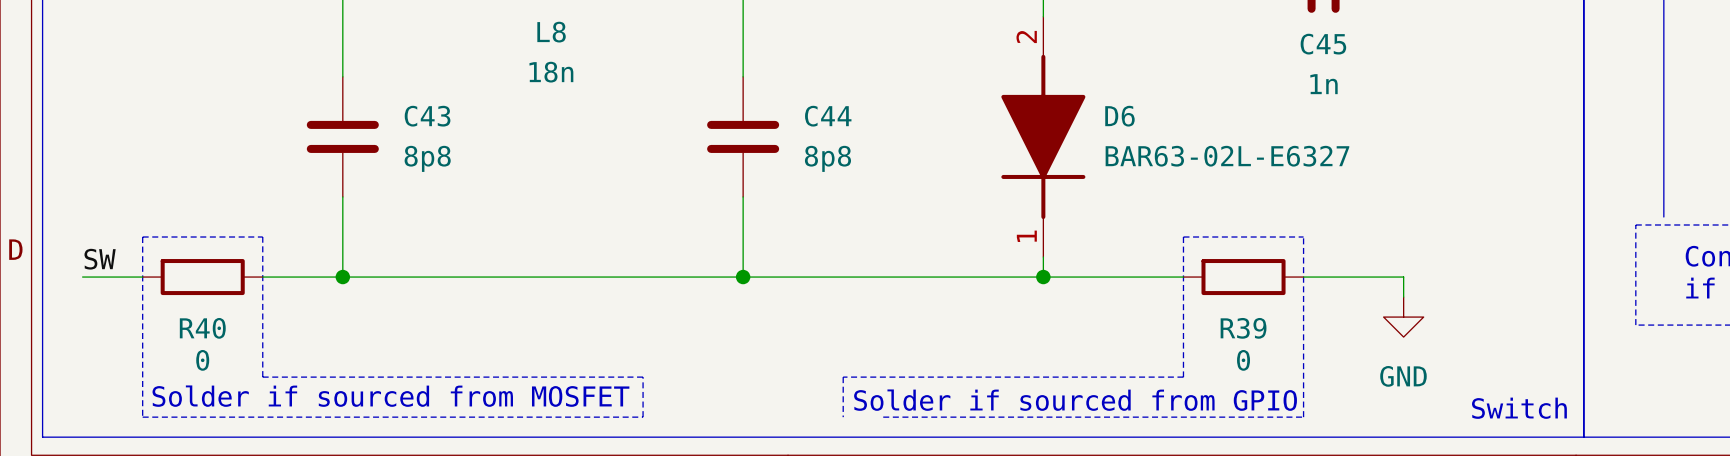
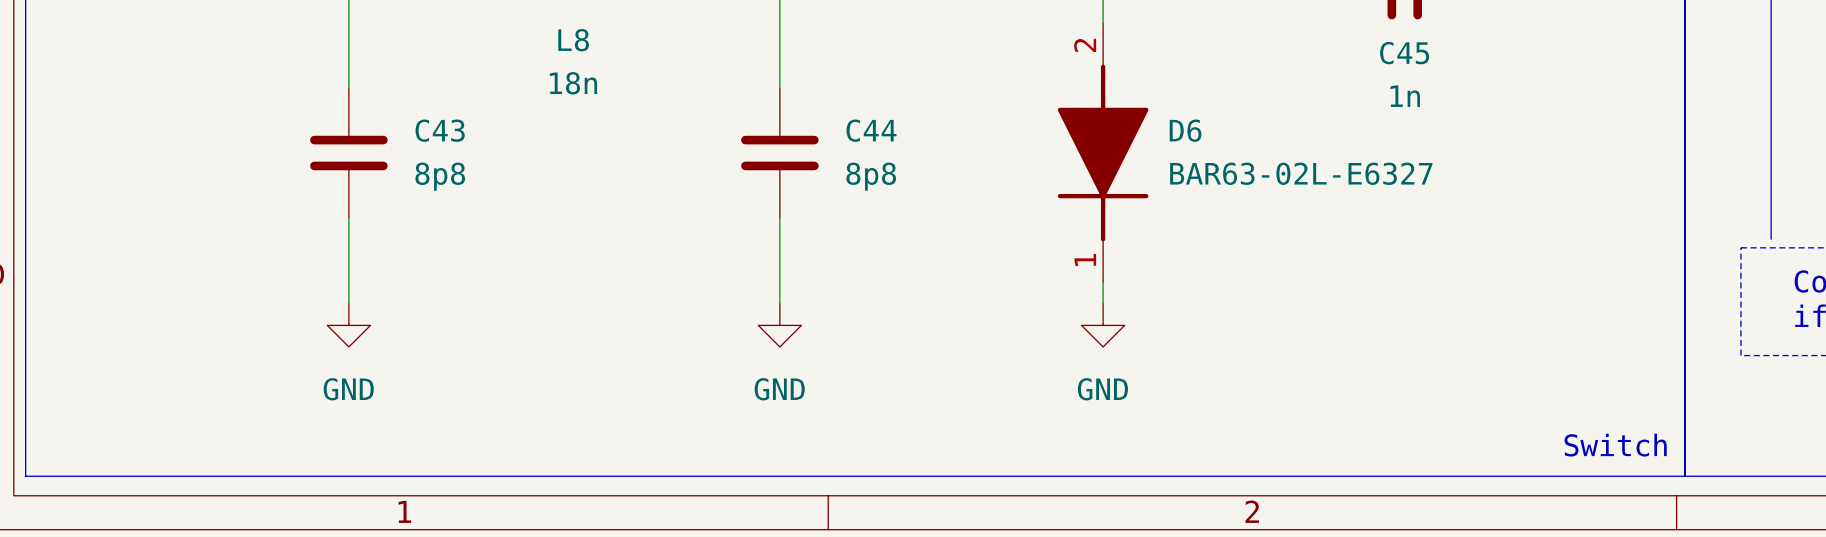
line: (142, 237) (262, 237) (262, 377) (643, 377) (643, 417) (142, 417) (142, 237) -> none
label: SW (100, 259) -> none
wire: (82, 277) (142, 277) -> none
R40: 0 (202, 277) -> none
wire: (262, 277) (1183, 277) -> none
junction: (342, 277) -> none
junction: (743, 277) -> none
junction: (1043, 277) -> none
R39: 0 (1243, 277) -> none
wire: (1303, 277) (1403, 277) (1403, 297) -> none
power symbol: none -> GND (348, 325)
power symbol: none -> GND (779, 325)
power symbol: none -> GND (1103, 325)
power symbol: GND (1403, 317) -> none
text: Solder if sourced from MOSFET (390, 396) -> none
text: Solder if sourced from GPIO (1075, 400) -> none
line: (843, 417) (843, 377) (1183, 377) (1183, 237) (1303, 237) (1303, 417) (883, 417) -> none

